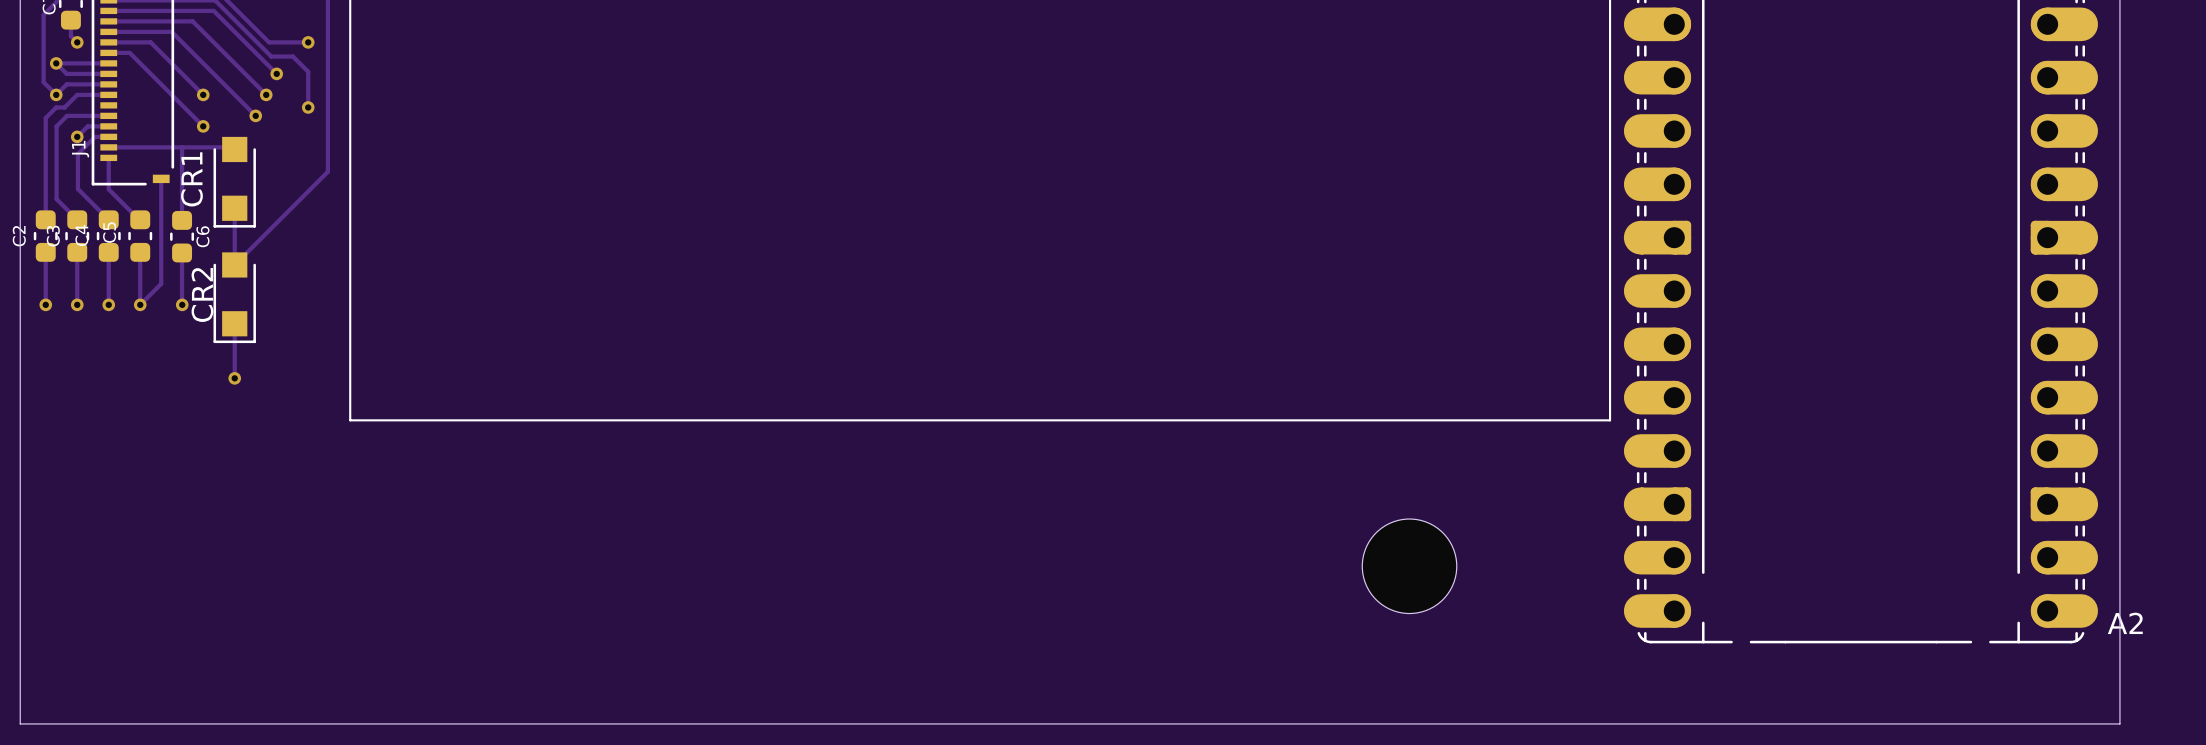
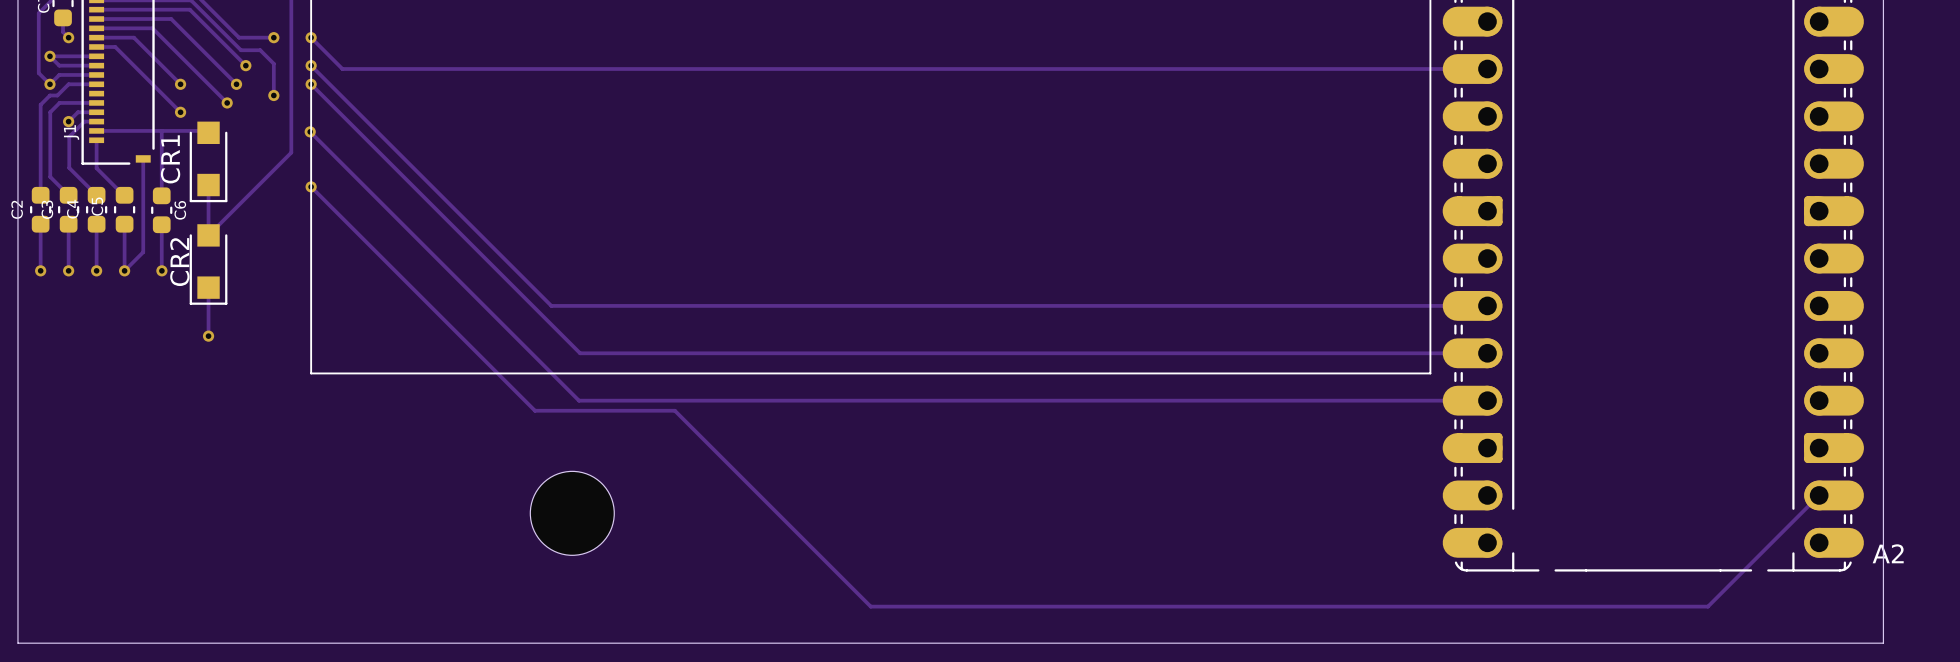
track: none -> (311, 37) (342, 69) (1487, 69)
via: none -> (311, 37)
track: none -> (311, 65) (551, 305) (1487, 305)
via: none -> (311, 65)
track: none -> (311, 84) (580, 353) (1487, 353)
via: none -> (311, 84)
track: none -> (310, 131) (579, 400) (1487, 400)
via: none -> (310, 131)
track: none -> (311, 186) (534, 410) (674, 410) (870, 606) (1707, 606) (1819, 495)
via: none -> (311, 186)
part: (1409, 566) -> none
part: none -> (572, 513)

